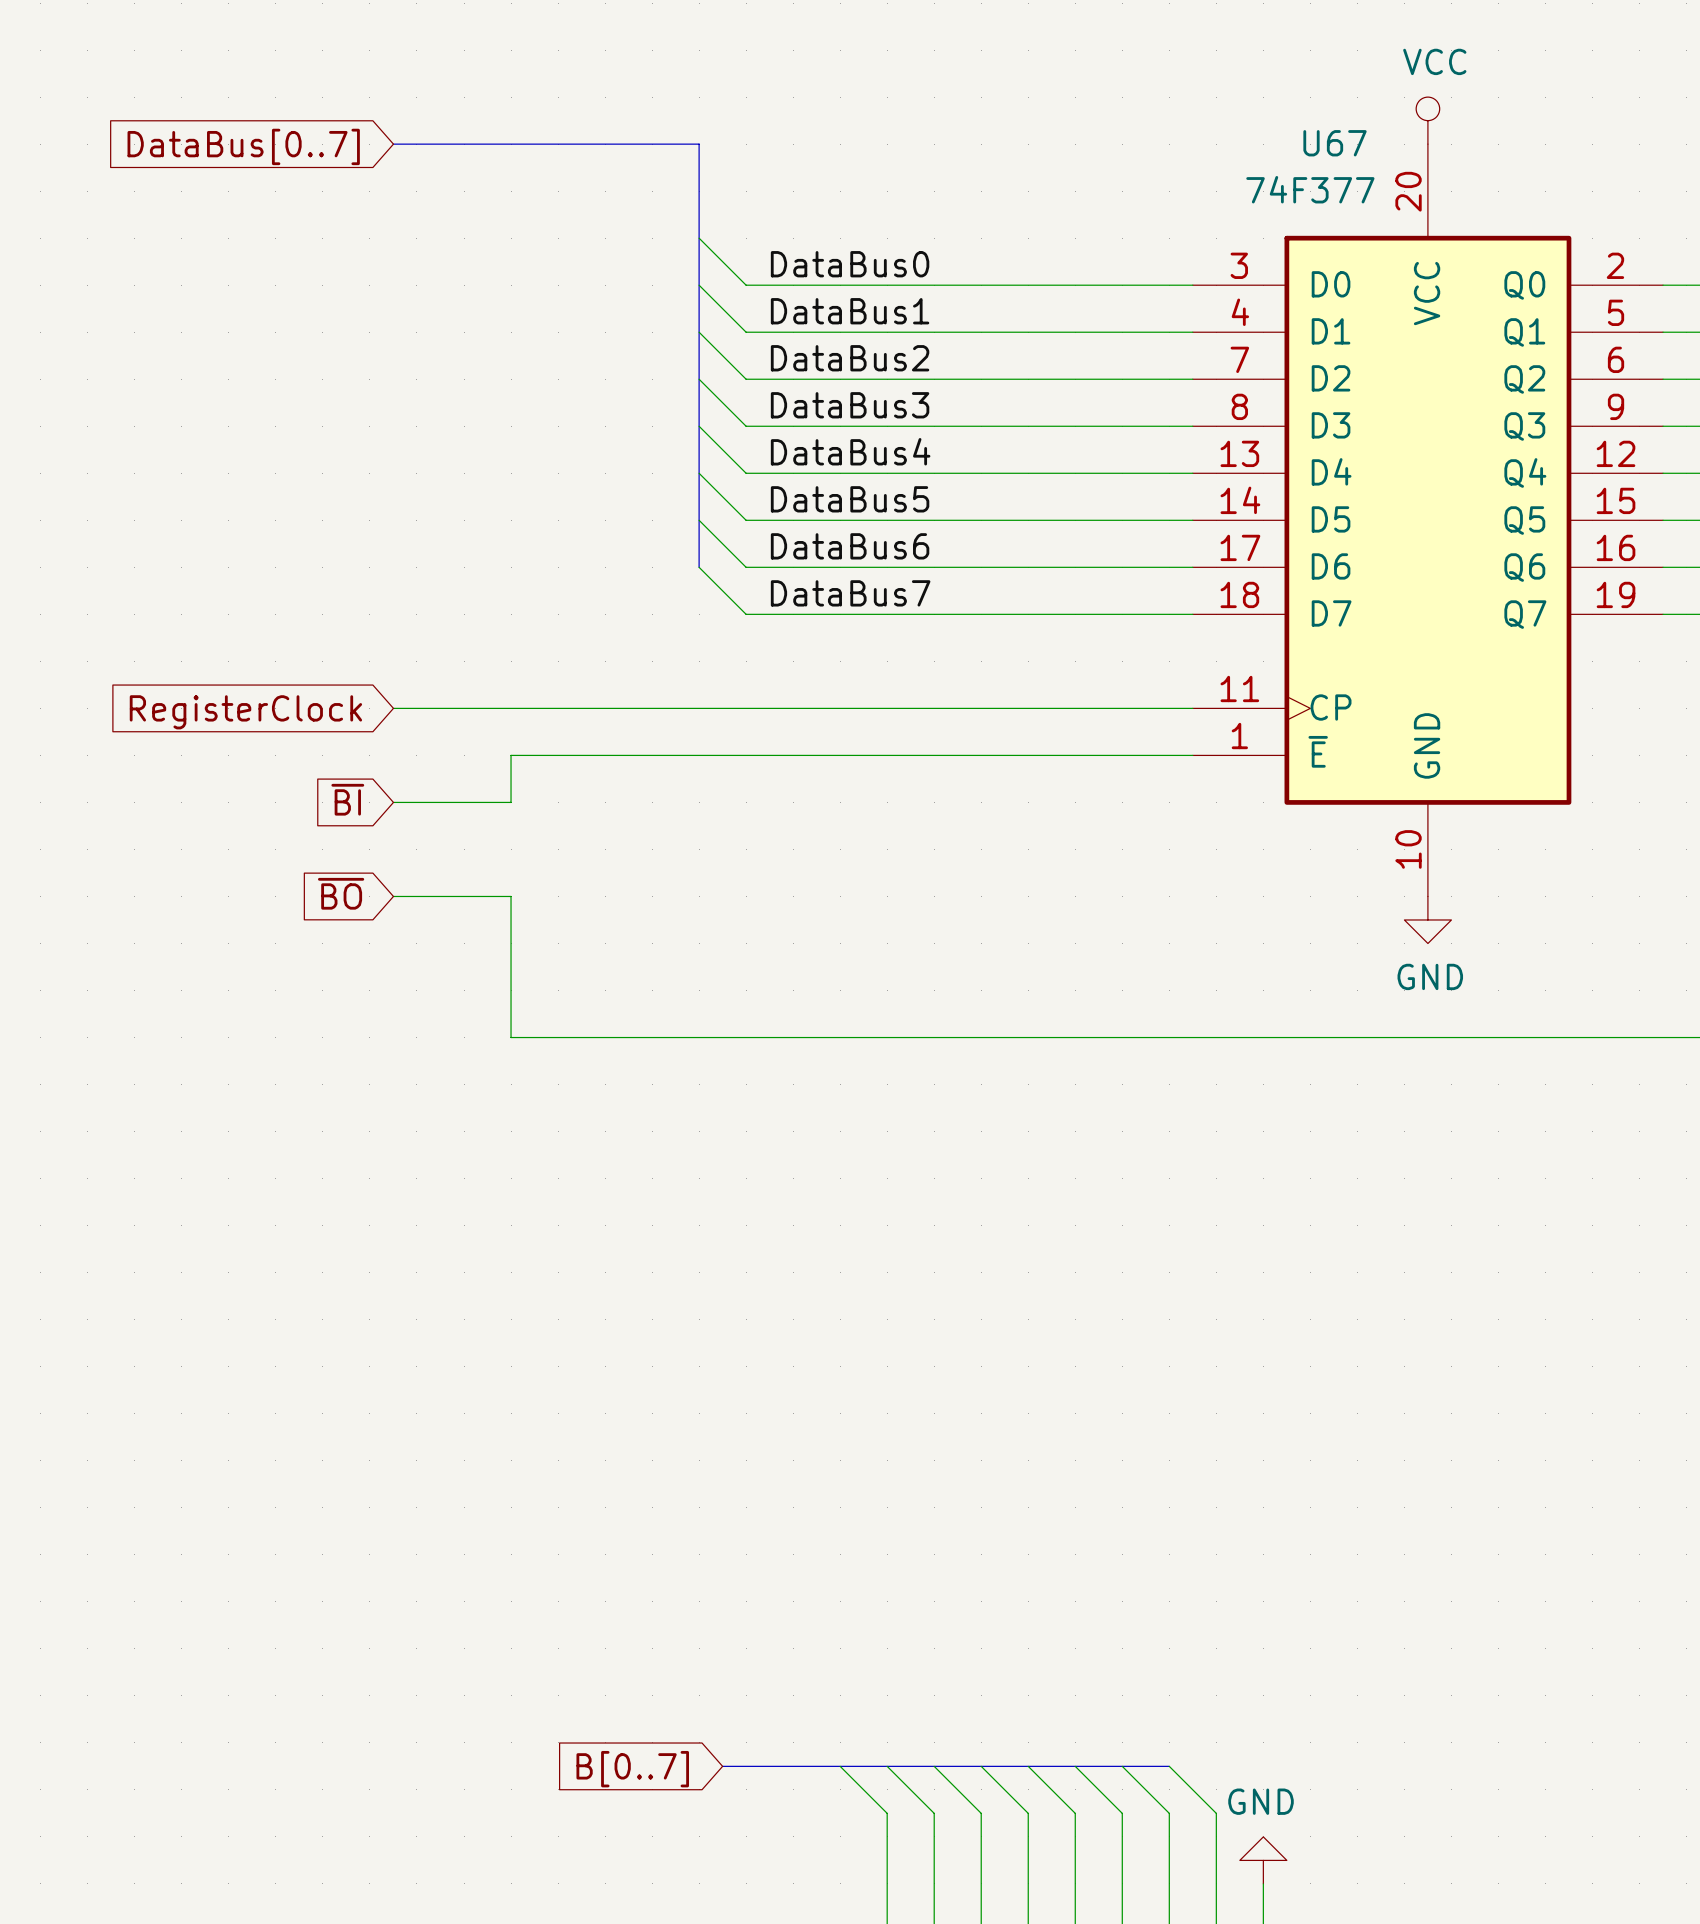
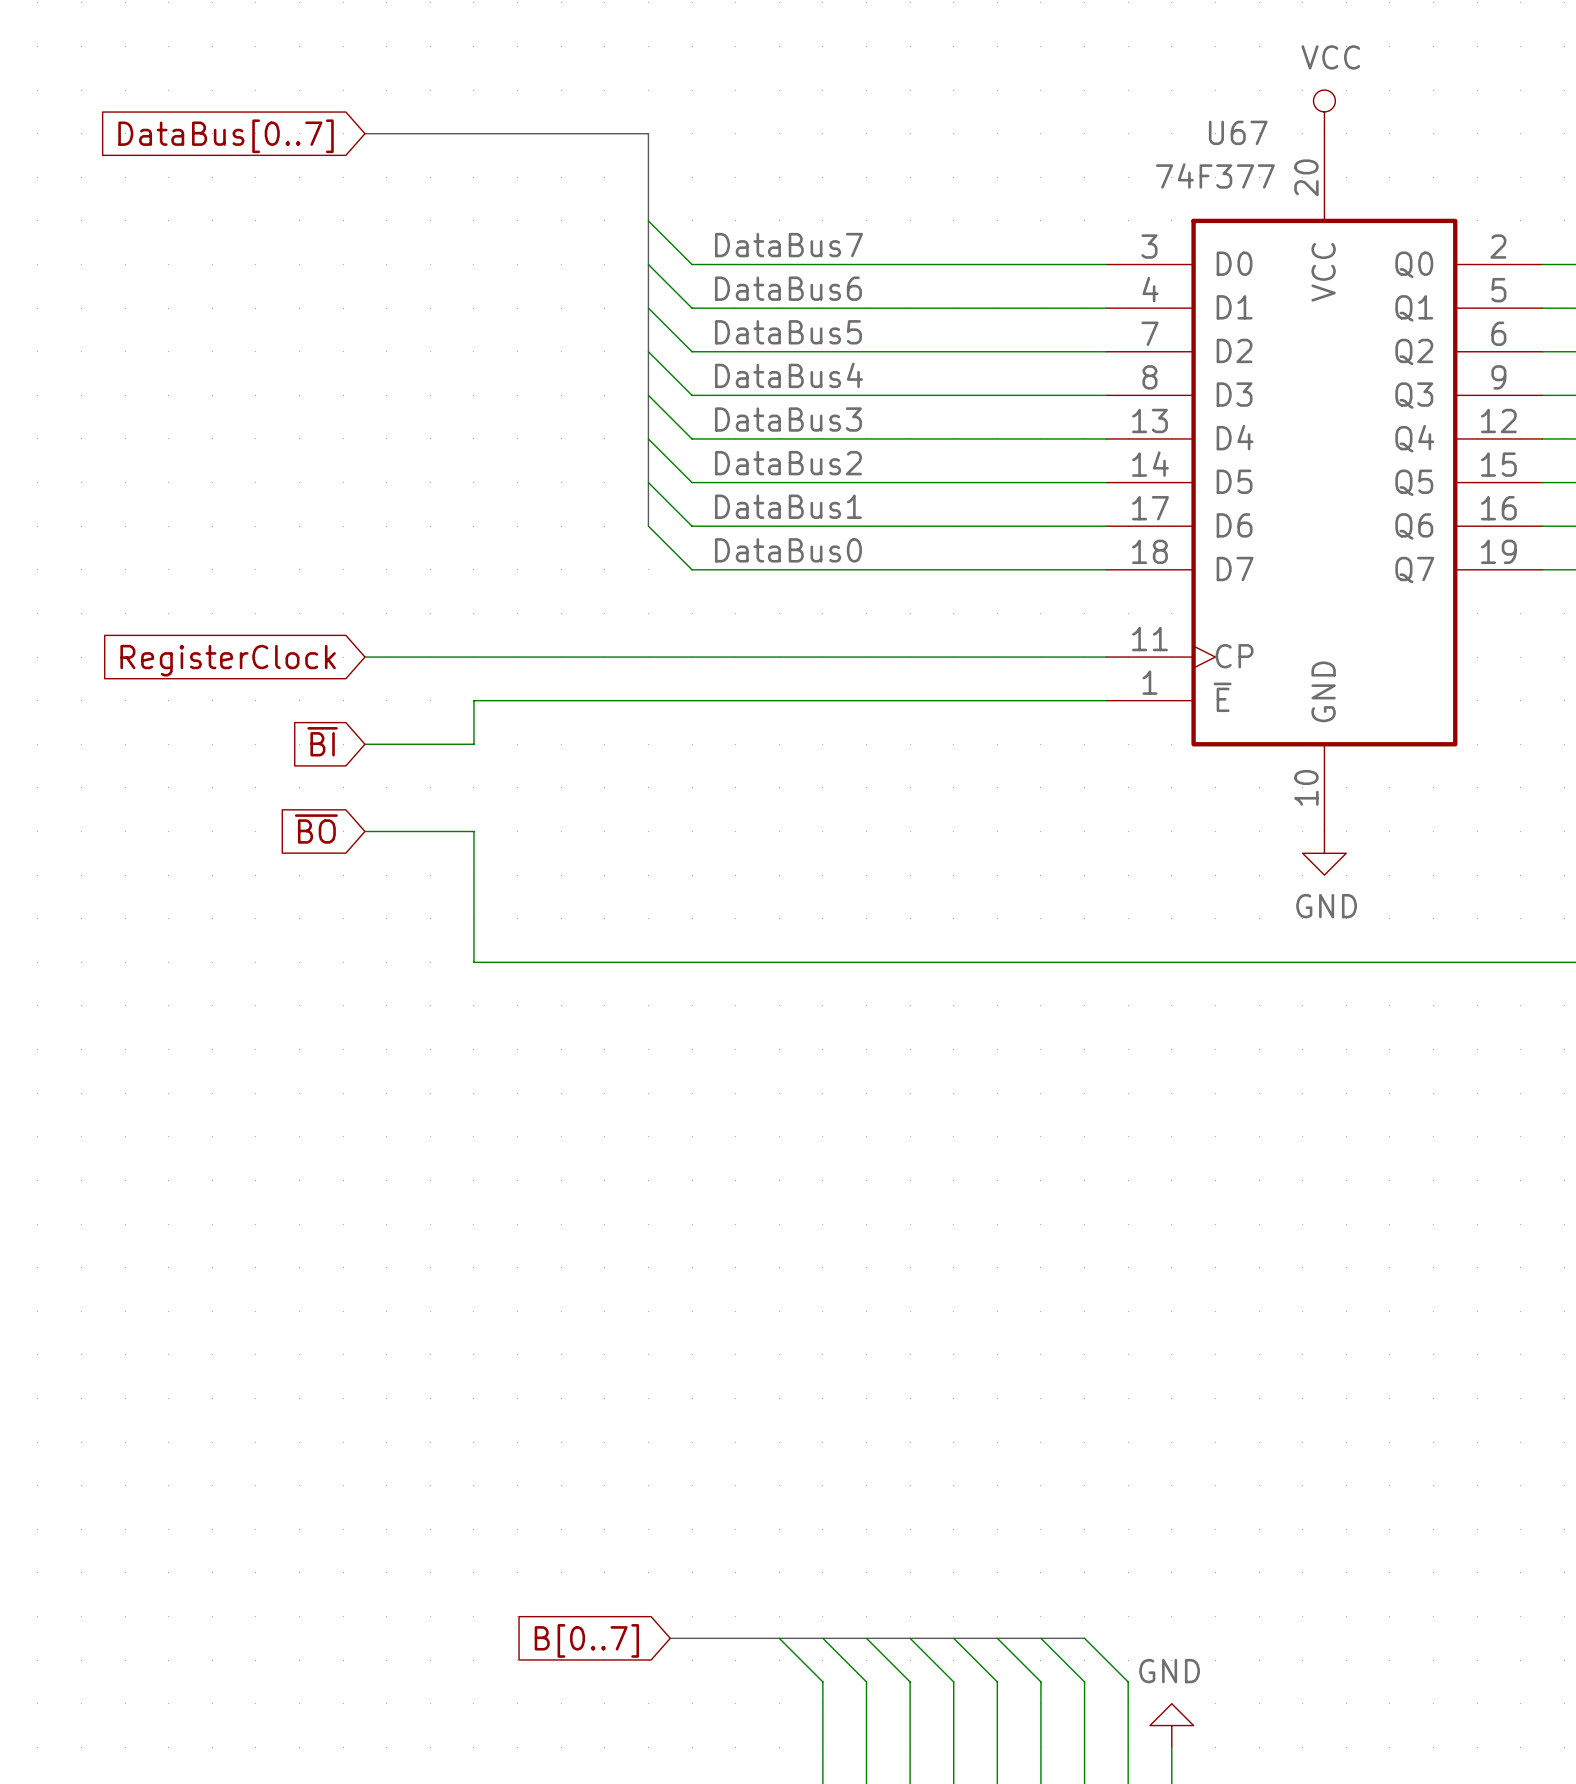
label: DataBus0 (850, 264) -> DataBus7 (788, 245)
label: DataBus1 (850, 311) -> DataBus6 (788, 288)
label: DataBus2 (850, 358) -> DataBus5 (788, 332)
label: DataBus3 (850, 405) -> DataBus4 (788, 375)
label: DataBus4 (850, 451) -> DataBus3 (788, 419)
label: DataBus5 (850, 499) -> DataBus2 (788, 463)
label: DataBus6 (850, 546) -> DataBus1 (788, 506)
label: DataBus7 (850, 593) -> DataBus0 (788, 550)

